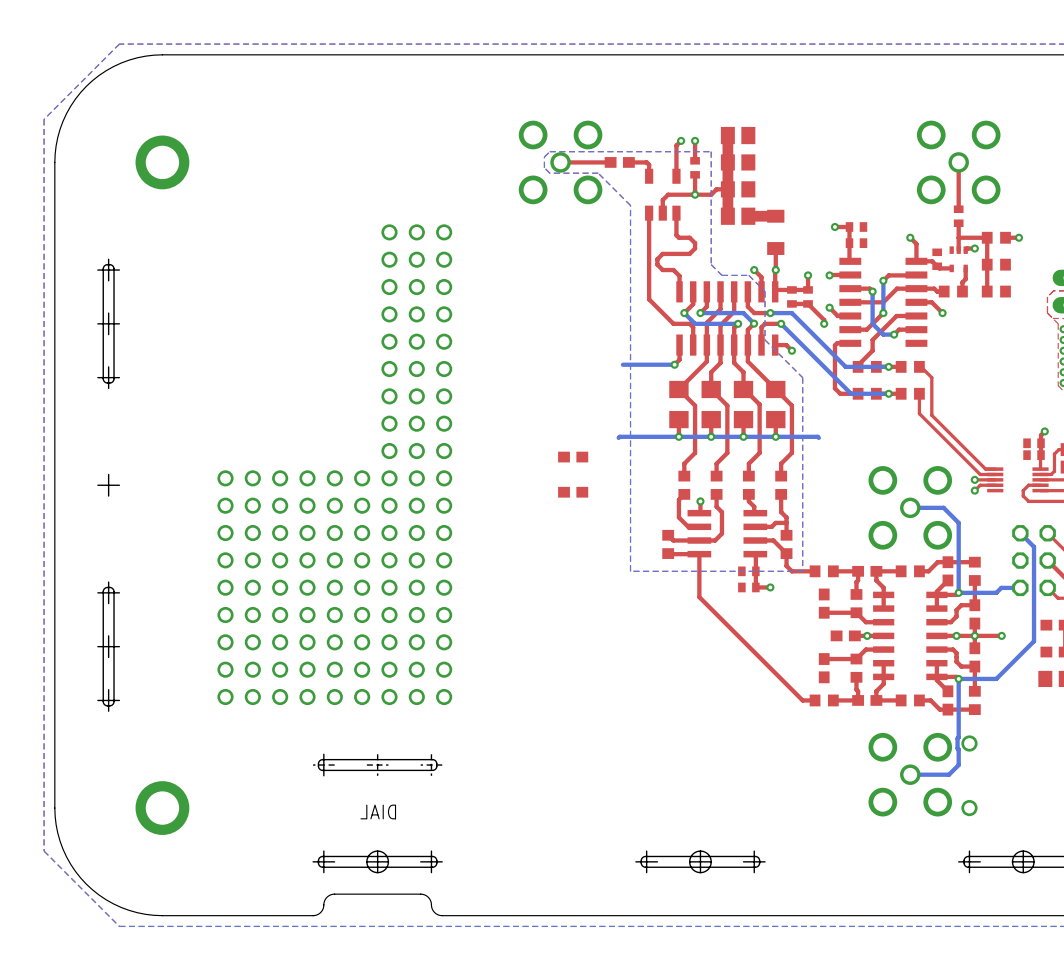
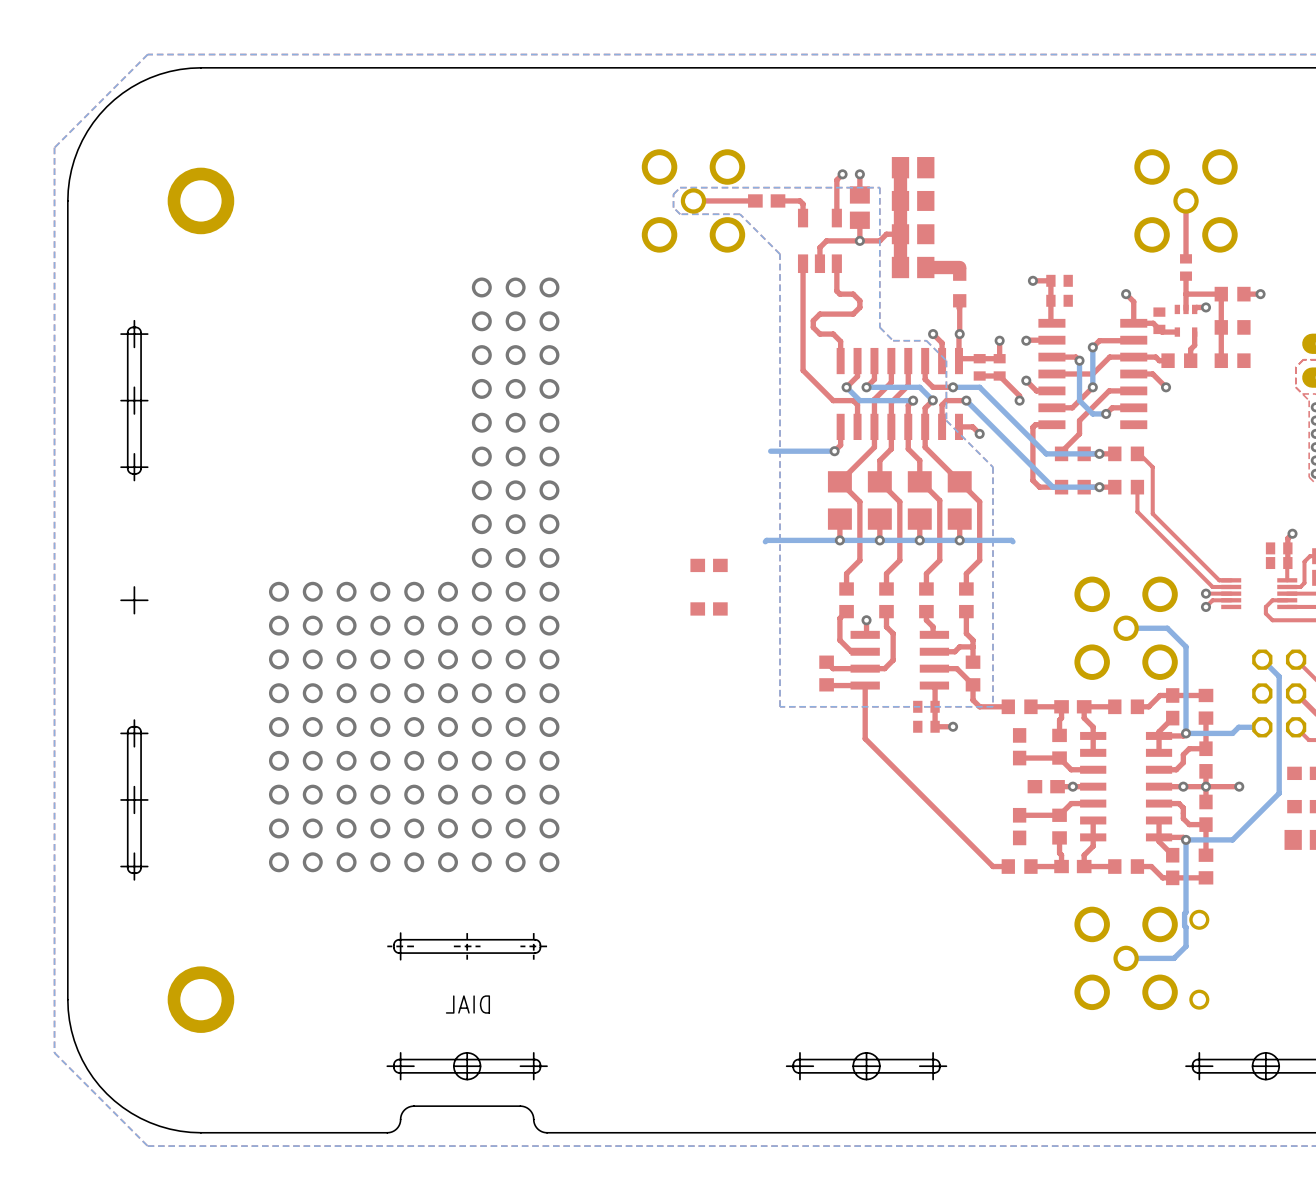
part footprint: [690, 157, 700, 179] -> [849, 186, 870, 229]
part footprint: [767, 209, 785, 255] -> [953, 267, 967, 308]

